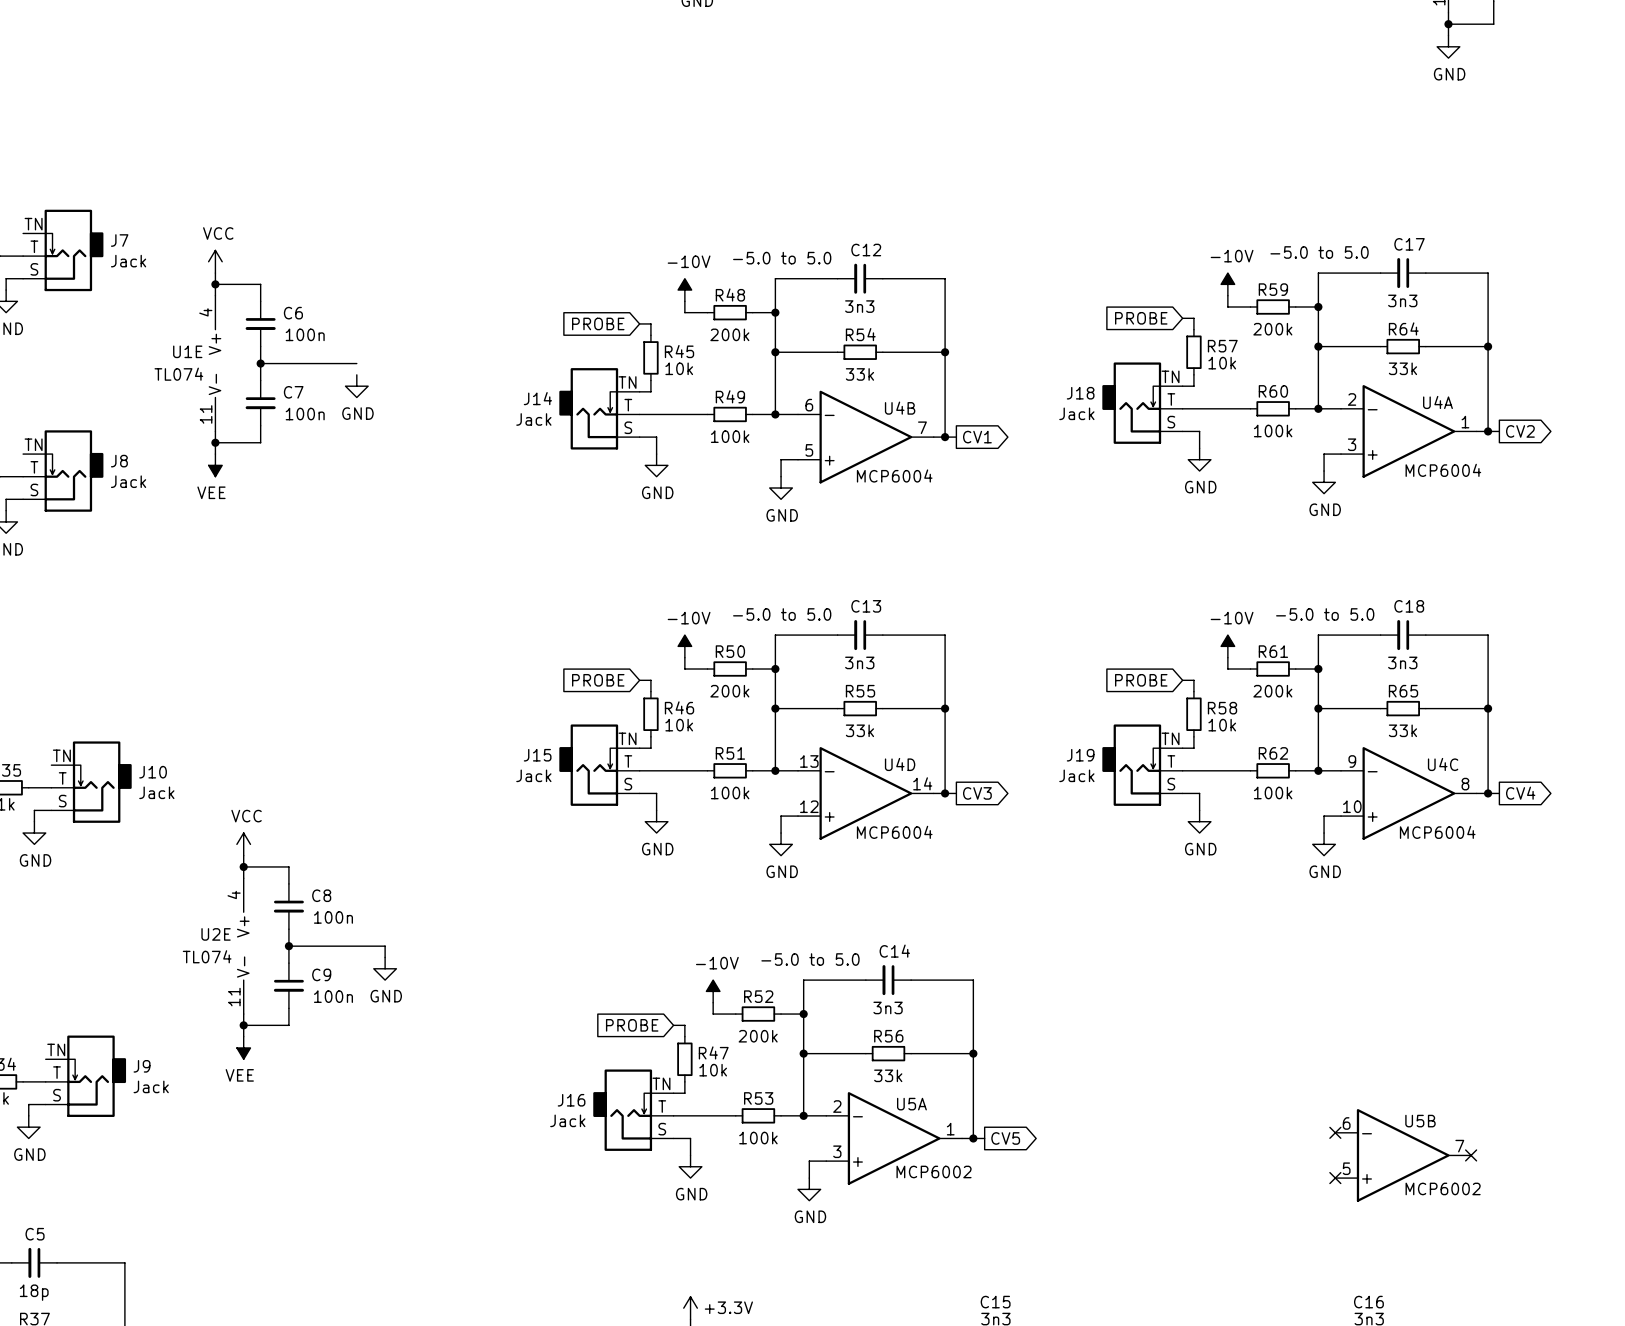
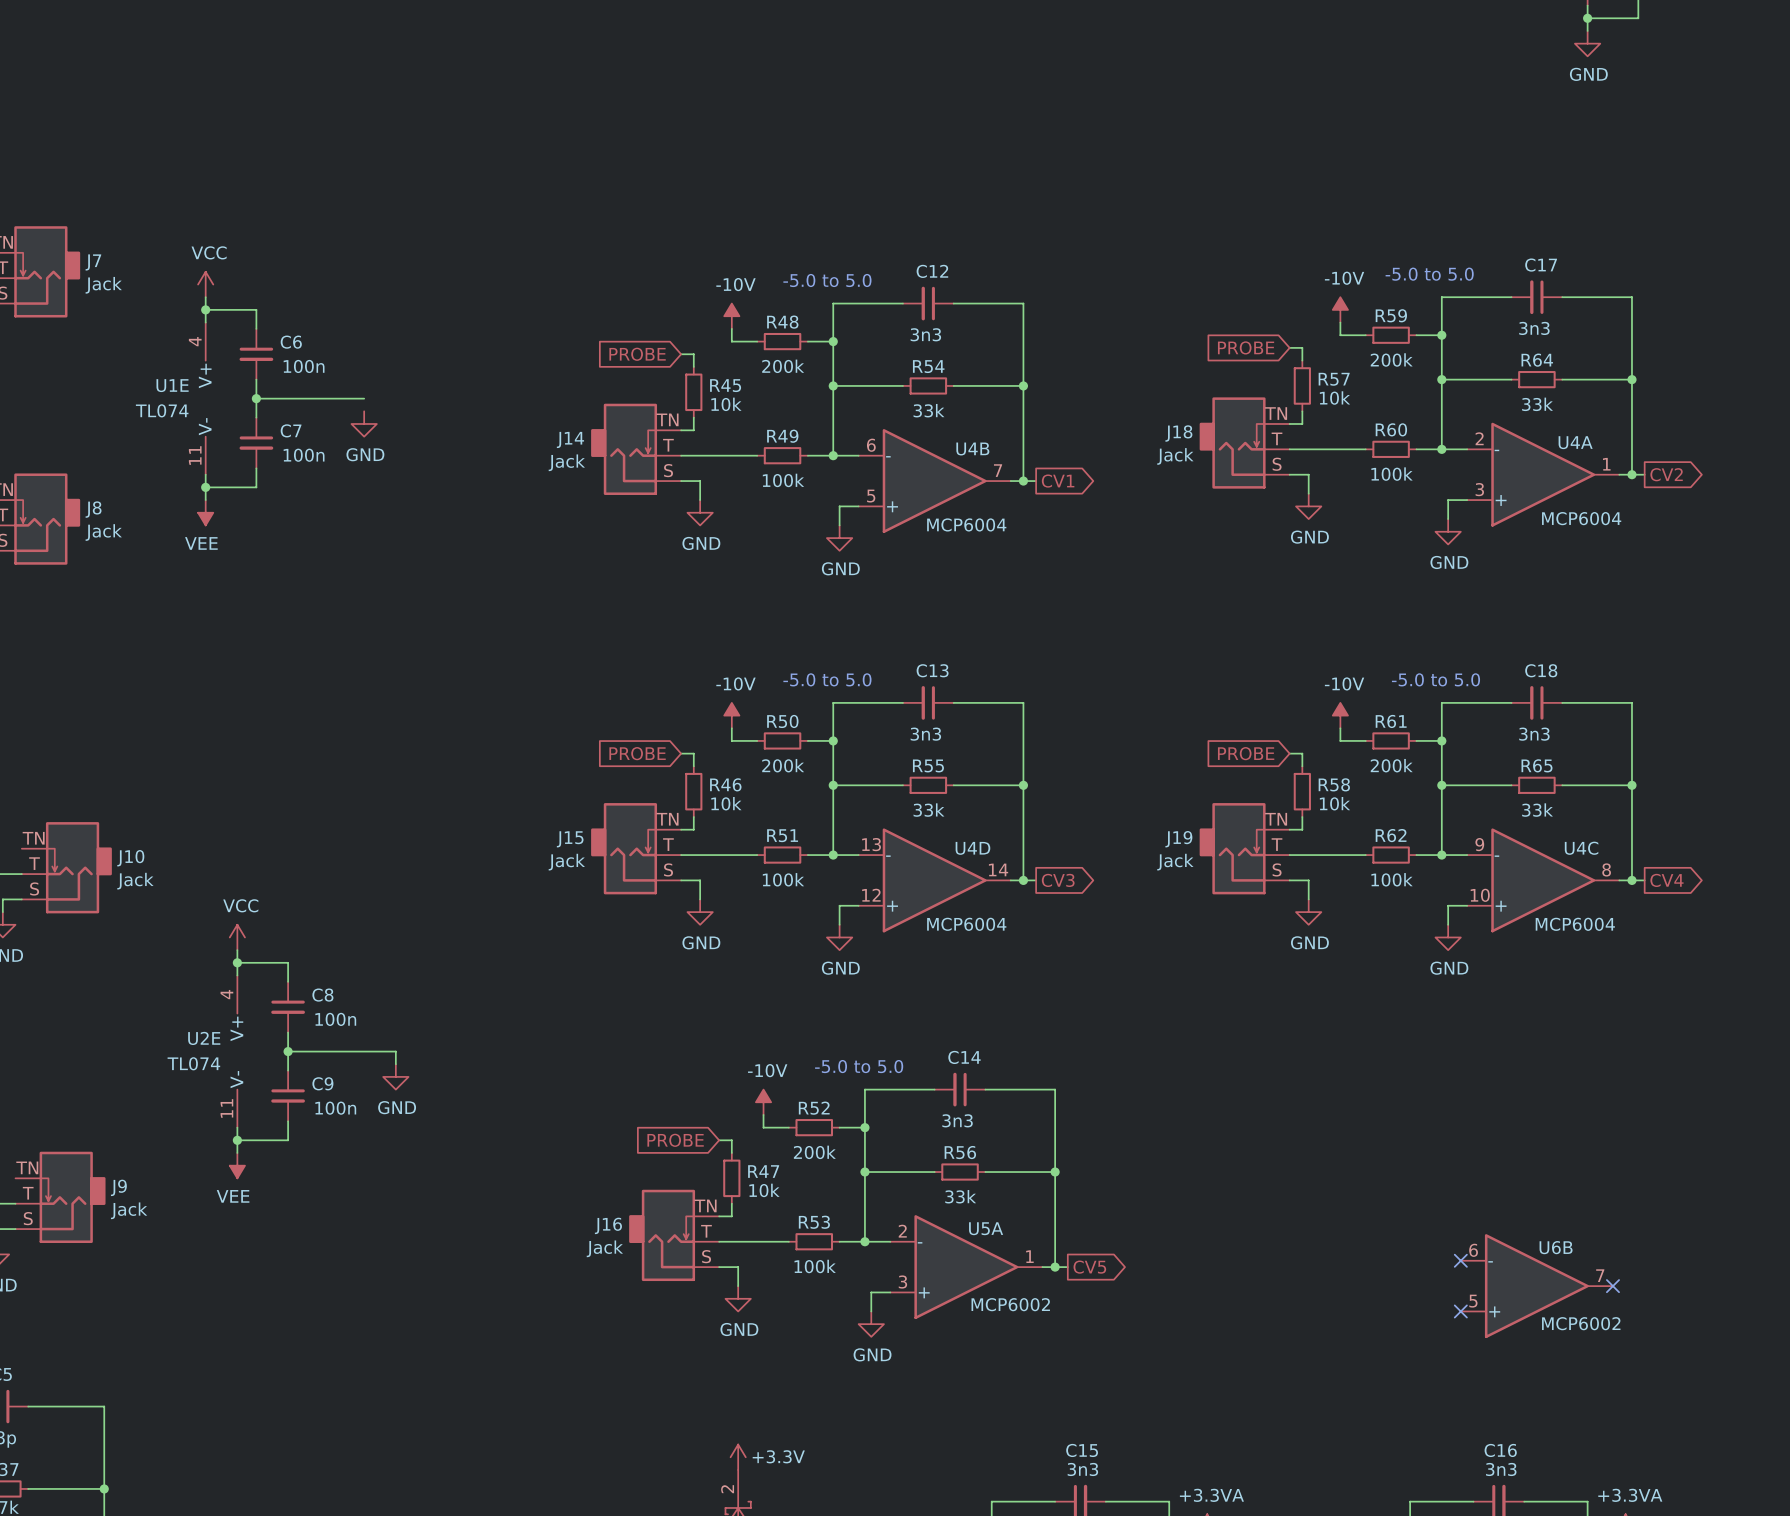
U5B name: U5B (1420, 1121) -> U6B (1556, 1247)

